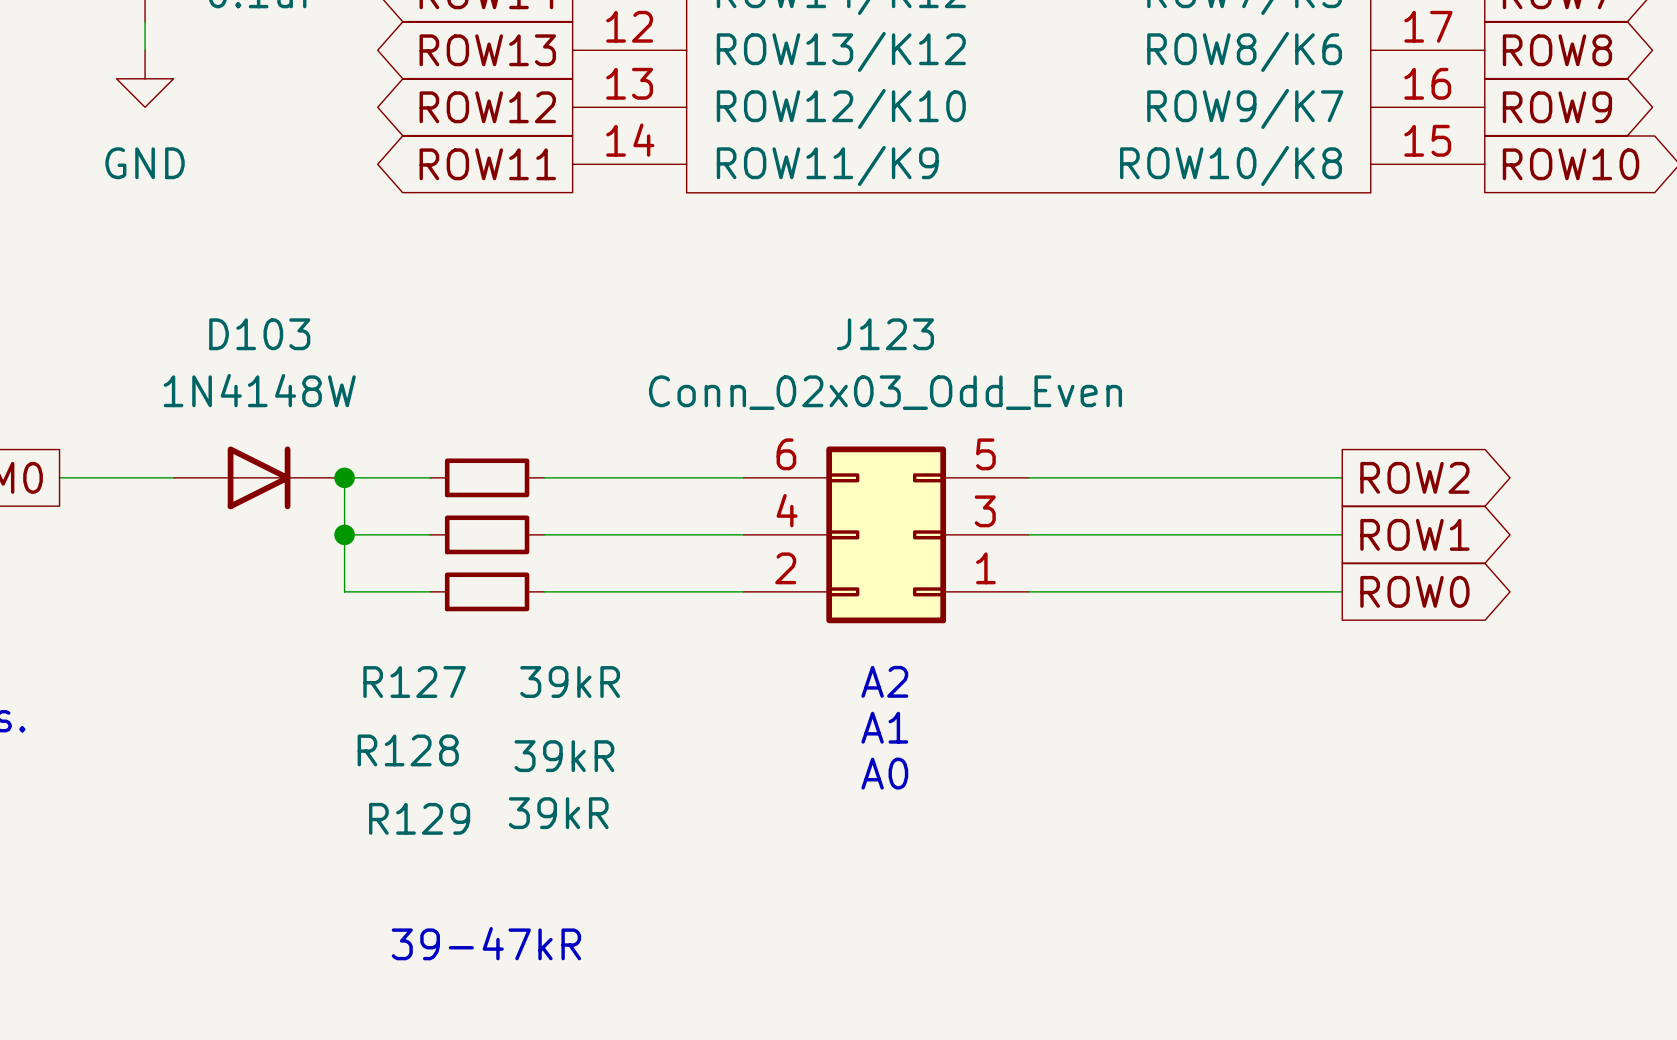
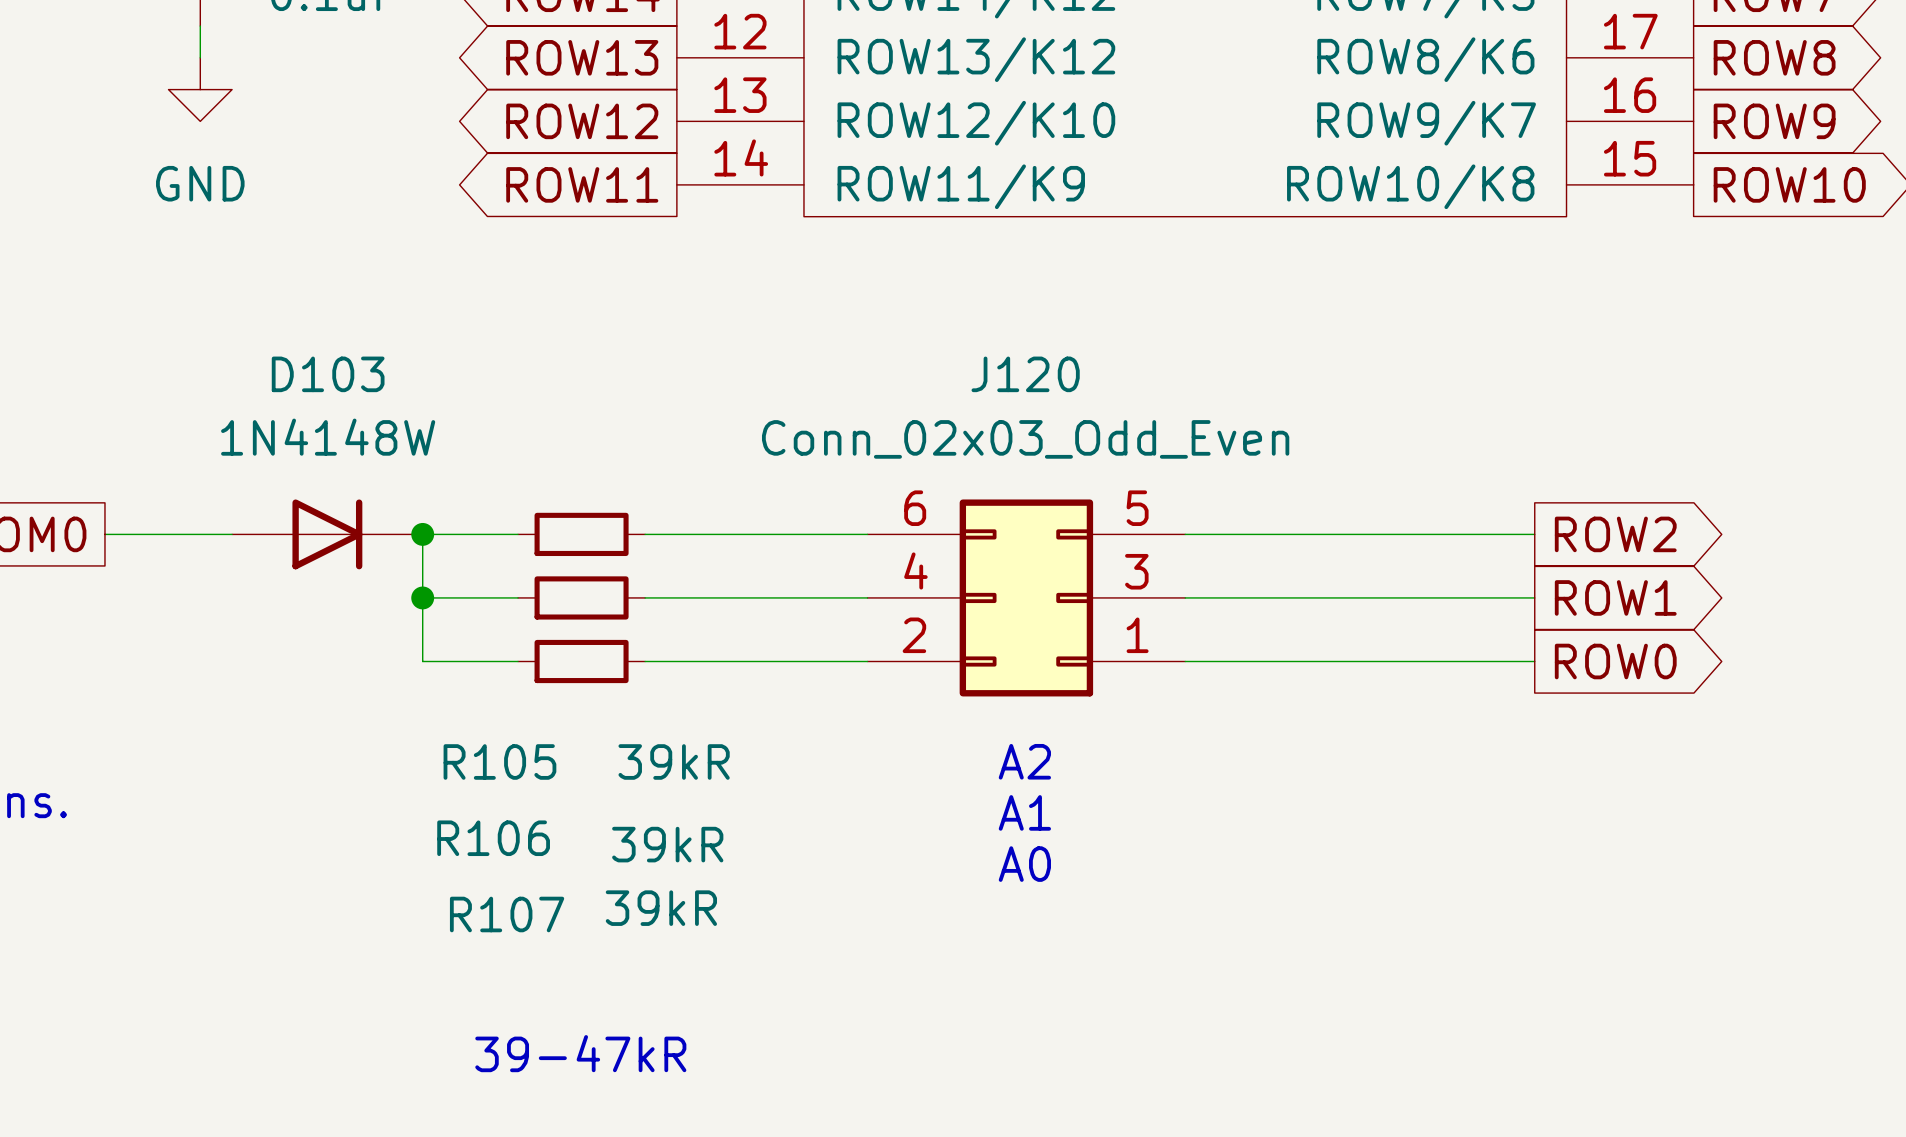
J123 name: J123 (885, 334) -> J120 (1025, 374)
R127 name: R127 (414, 682) -> R105 (499, 761)
R128 name: R128 (408, 750) -> R106 (493, 838)
R129 name: R129 (419, 818) -> R107 (507, 914)

